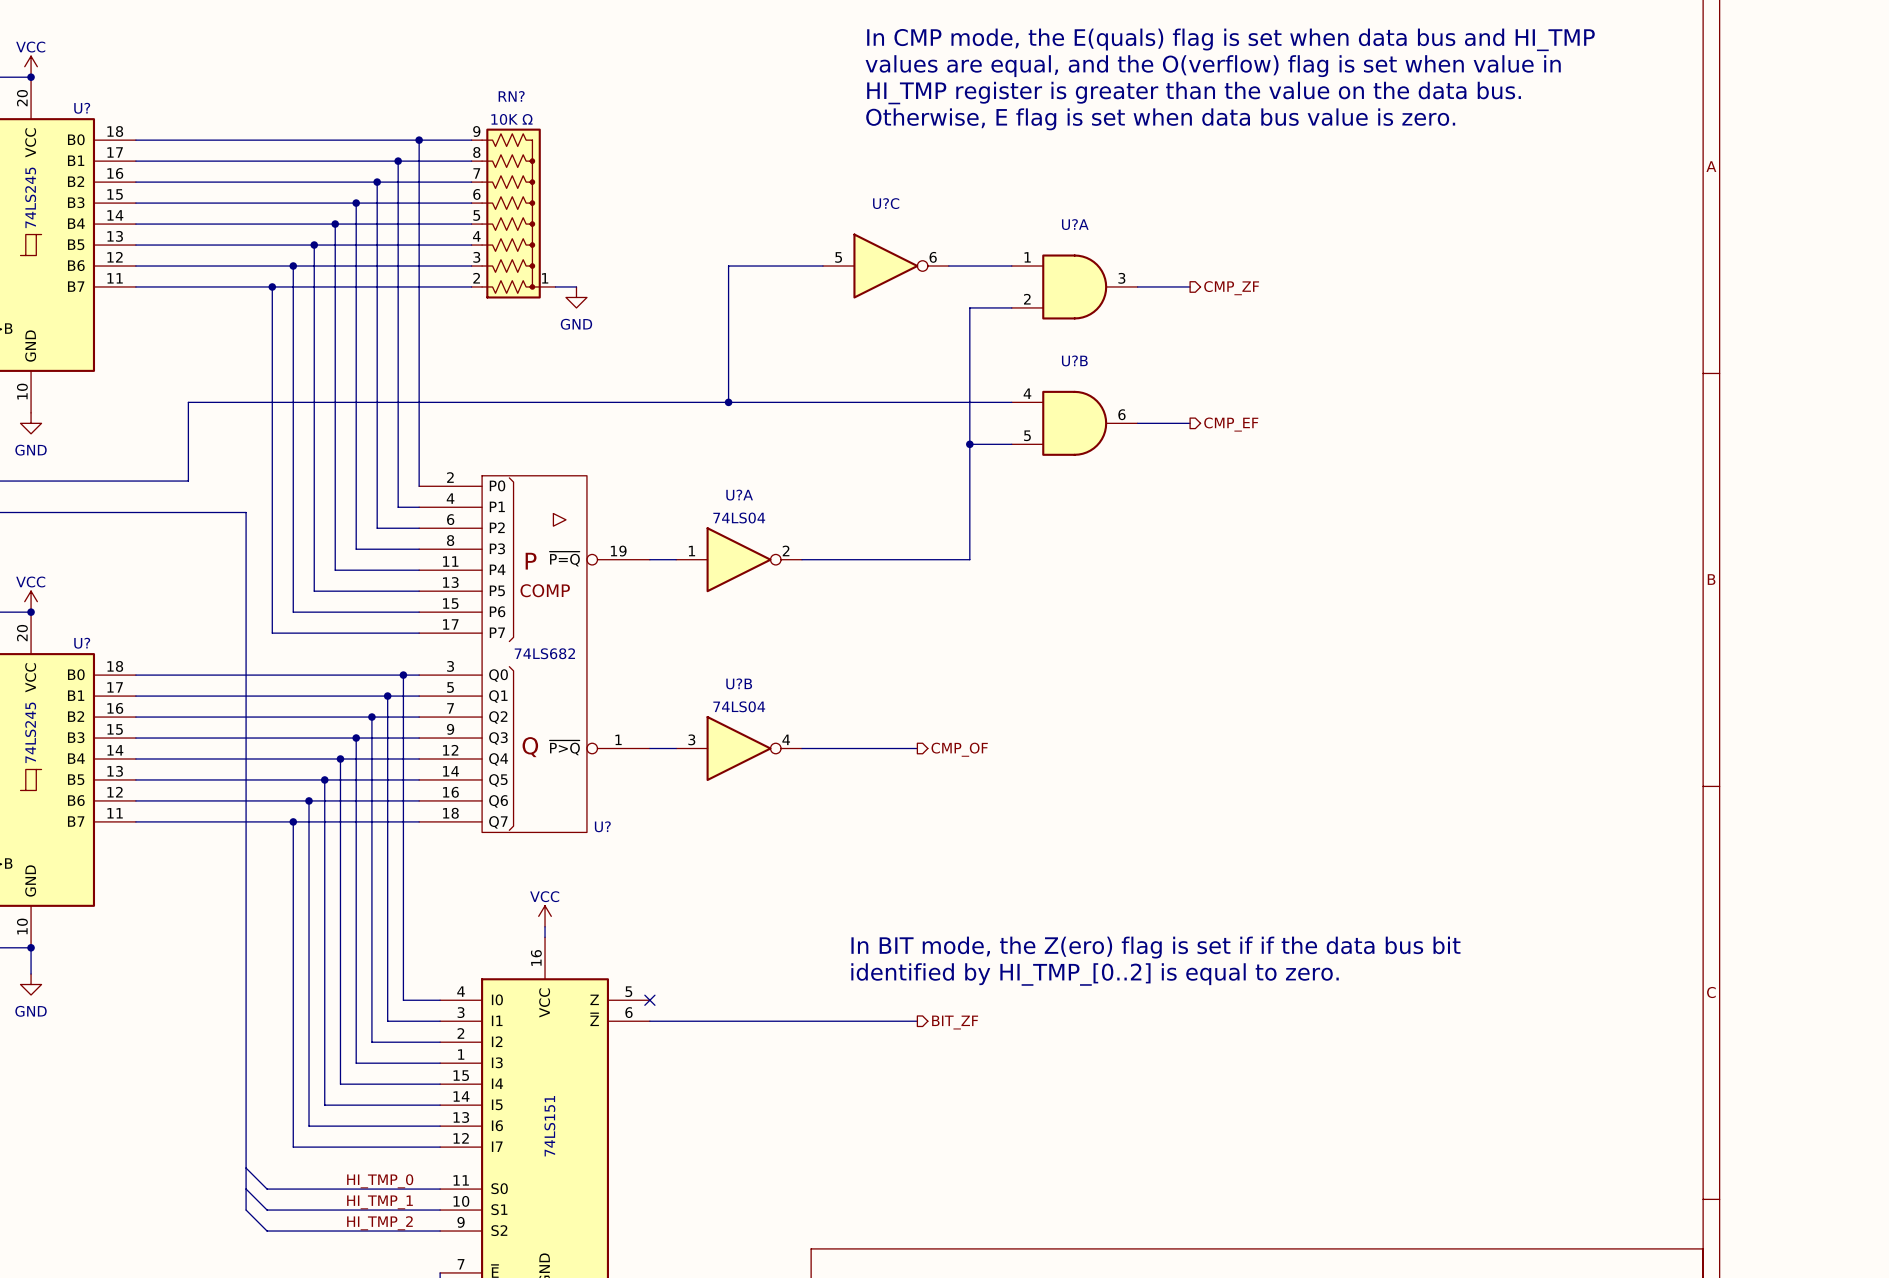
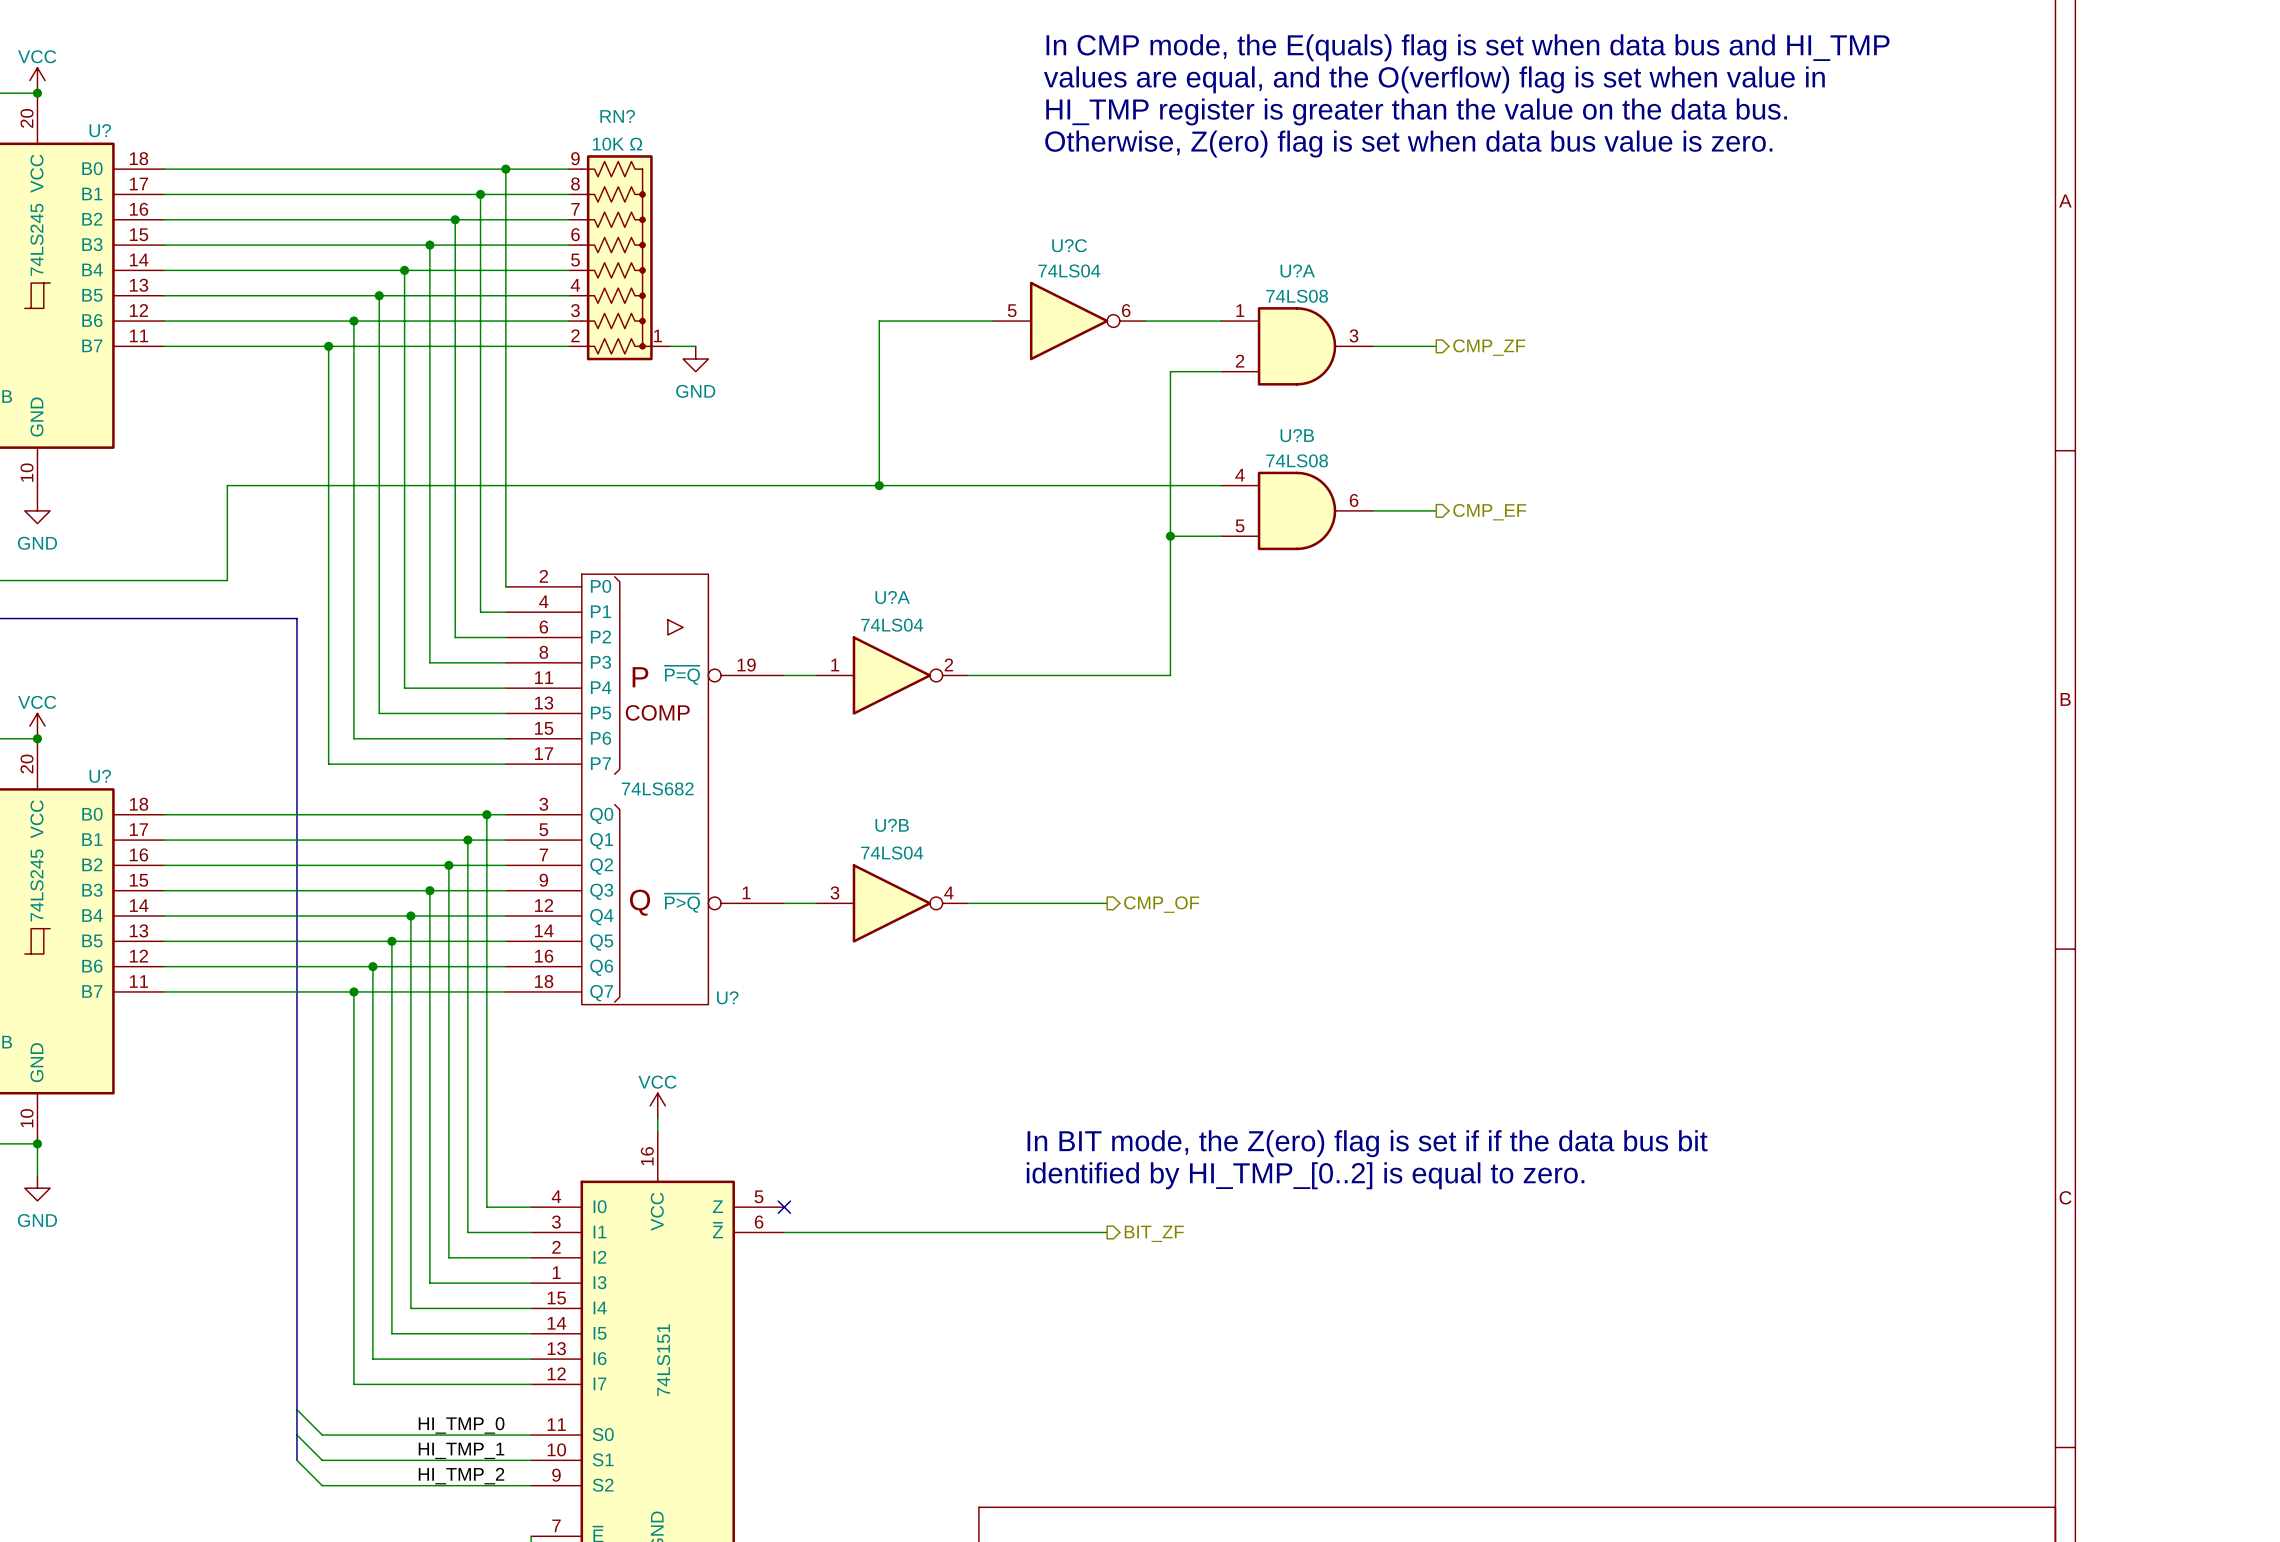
text: Otherwise, E flag is set when data bus value is zero. (1160, 119) -> Otherwise, Z(ero) flag is set when data bus value is zero. (1408, 144)
U?C value: none -> 74LS04 (1069, 270)
U?A value: none -> 74LS08 (1297, 296)
U?B value: none -> 74LS08 (1297, 460)

